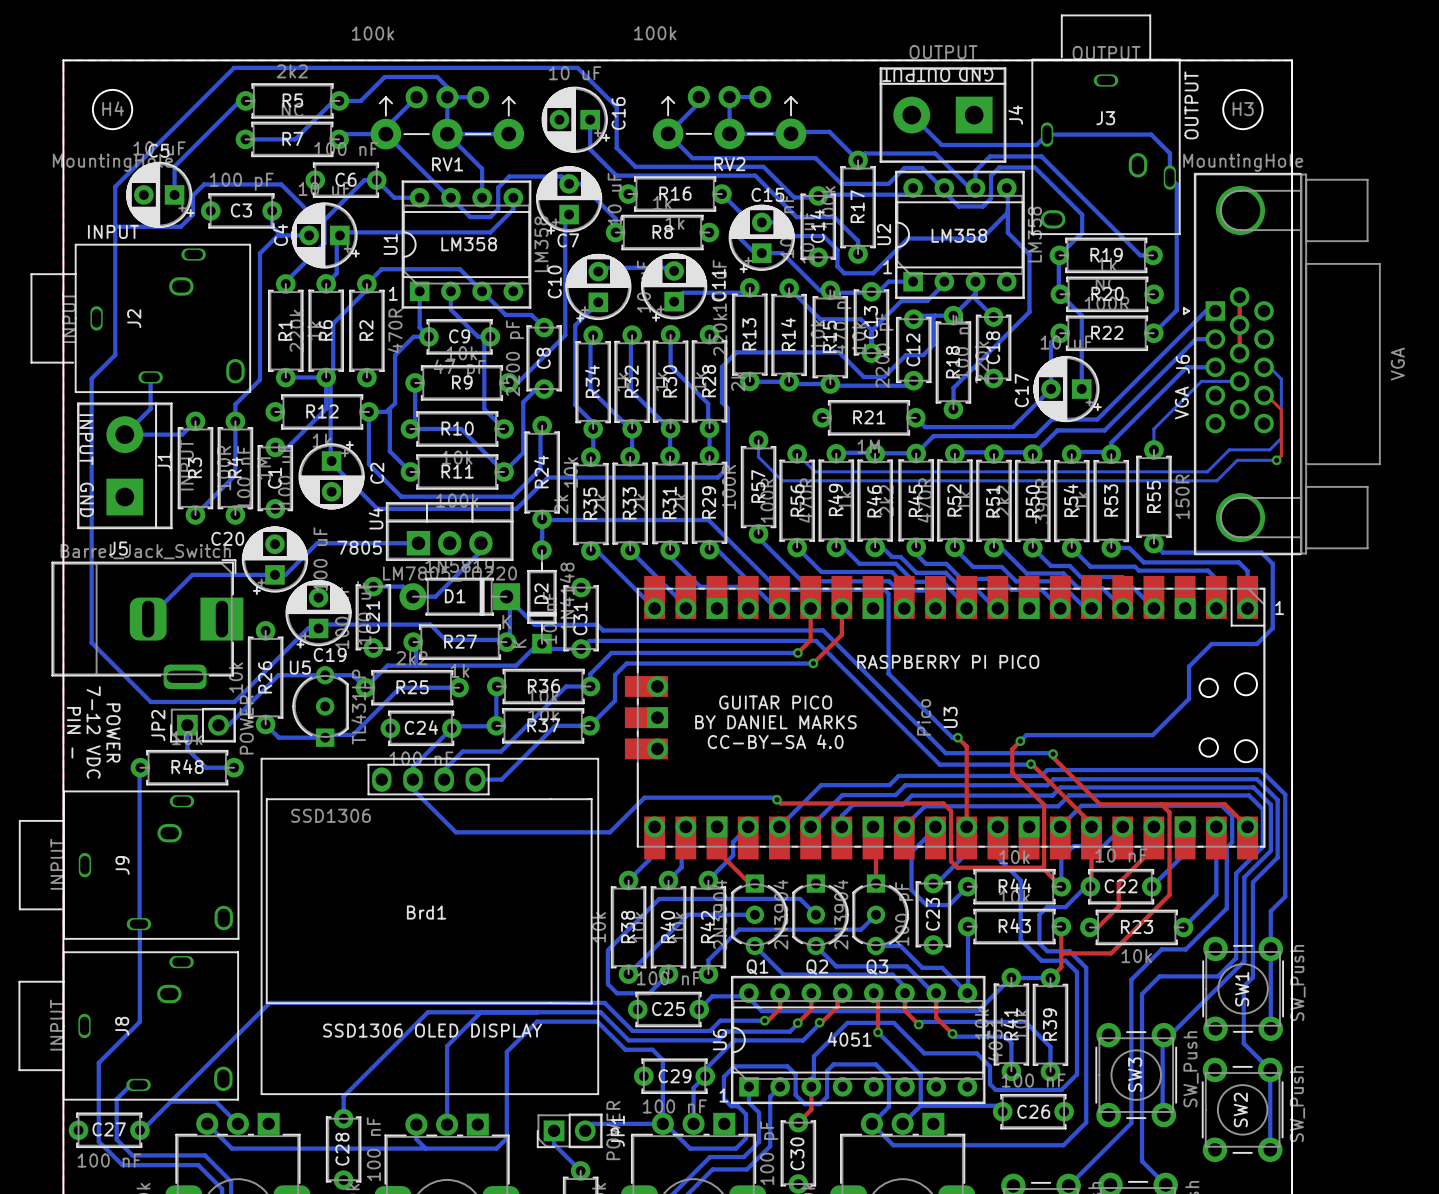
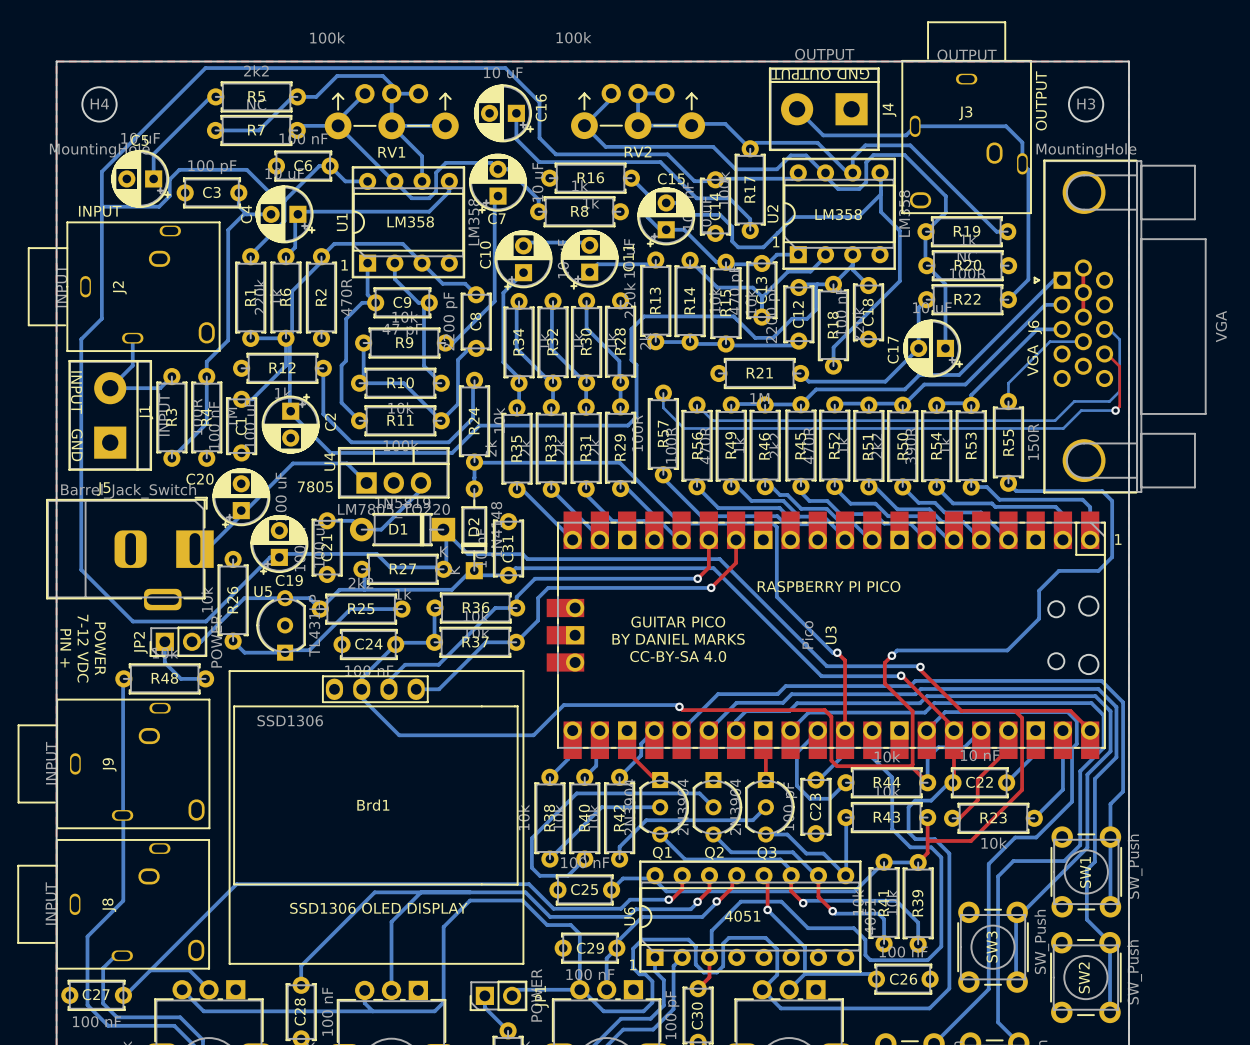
bottom track: (389, 408) (386, 411) (368, 411) -> none
bottom track: (418, 543) (317, 543) (285, 574) (192, 574) (148, 619) -> (366, 482) (347, 463) (292, 463) (207, 549) (194, 549)
text: PIN - (73, 732) -> PIN + (65, 648)

